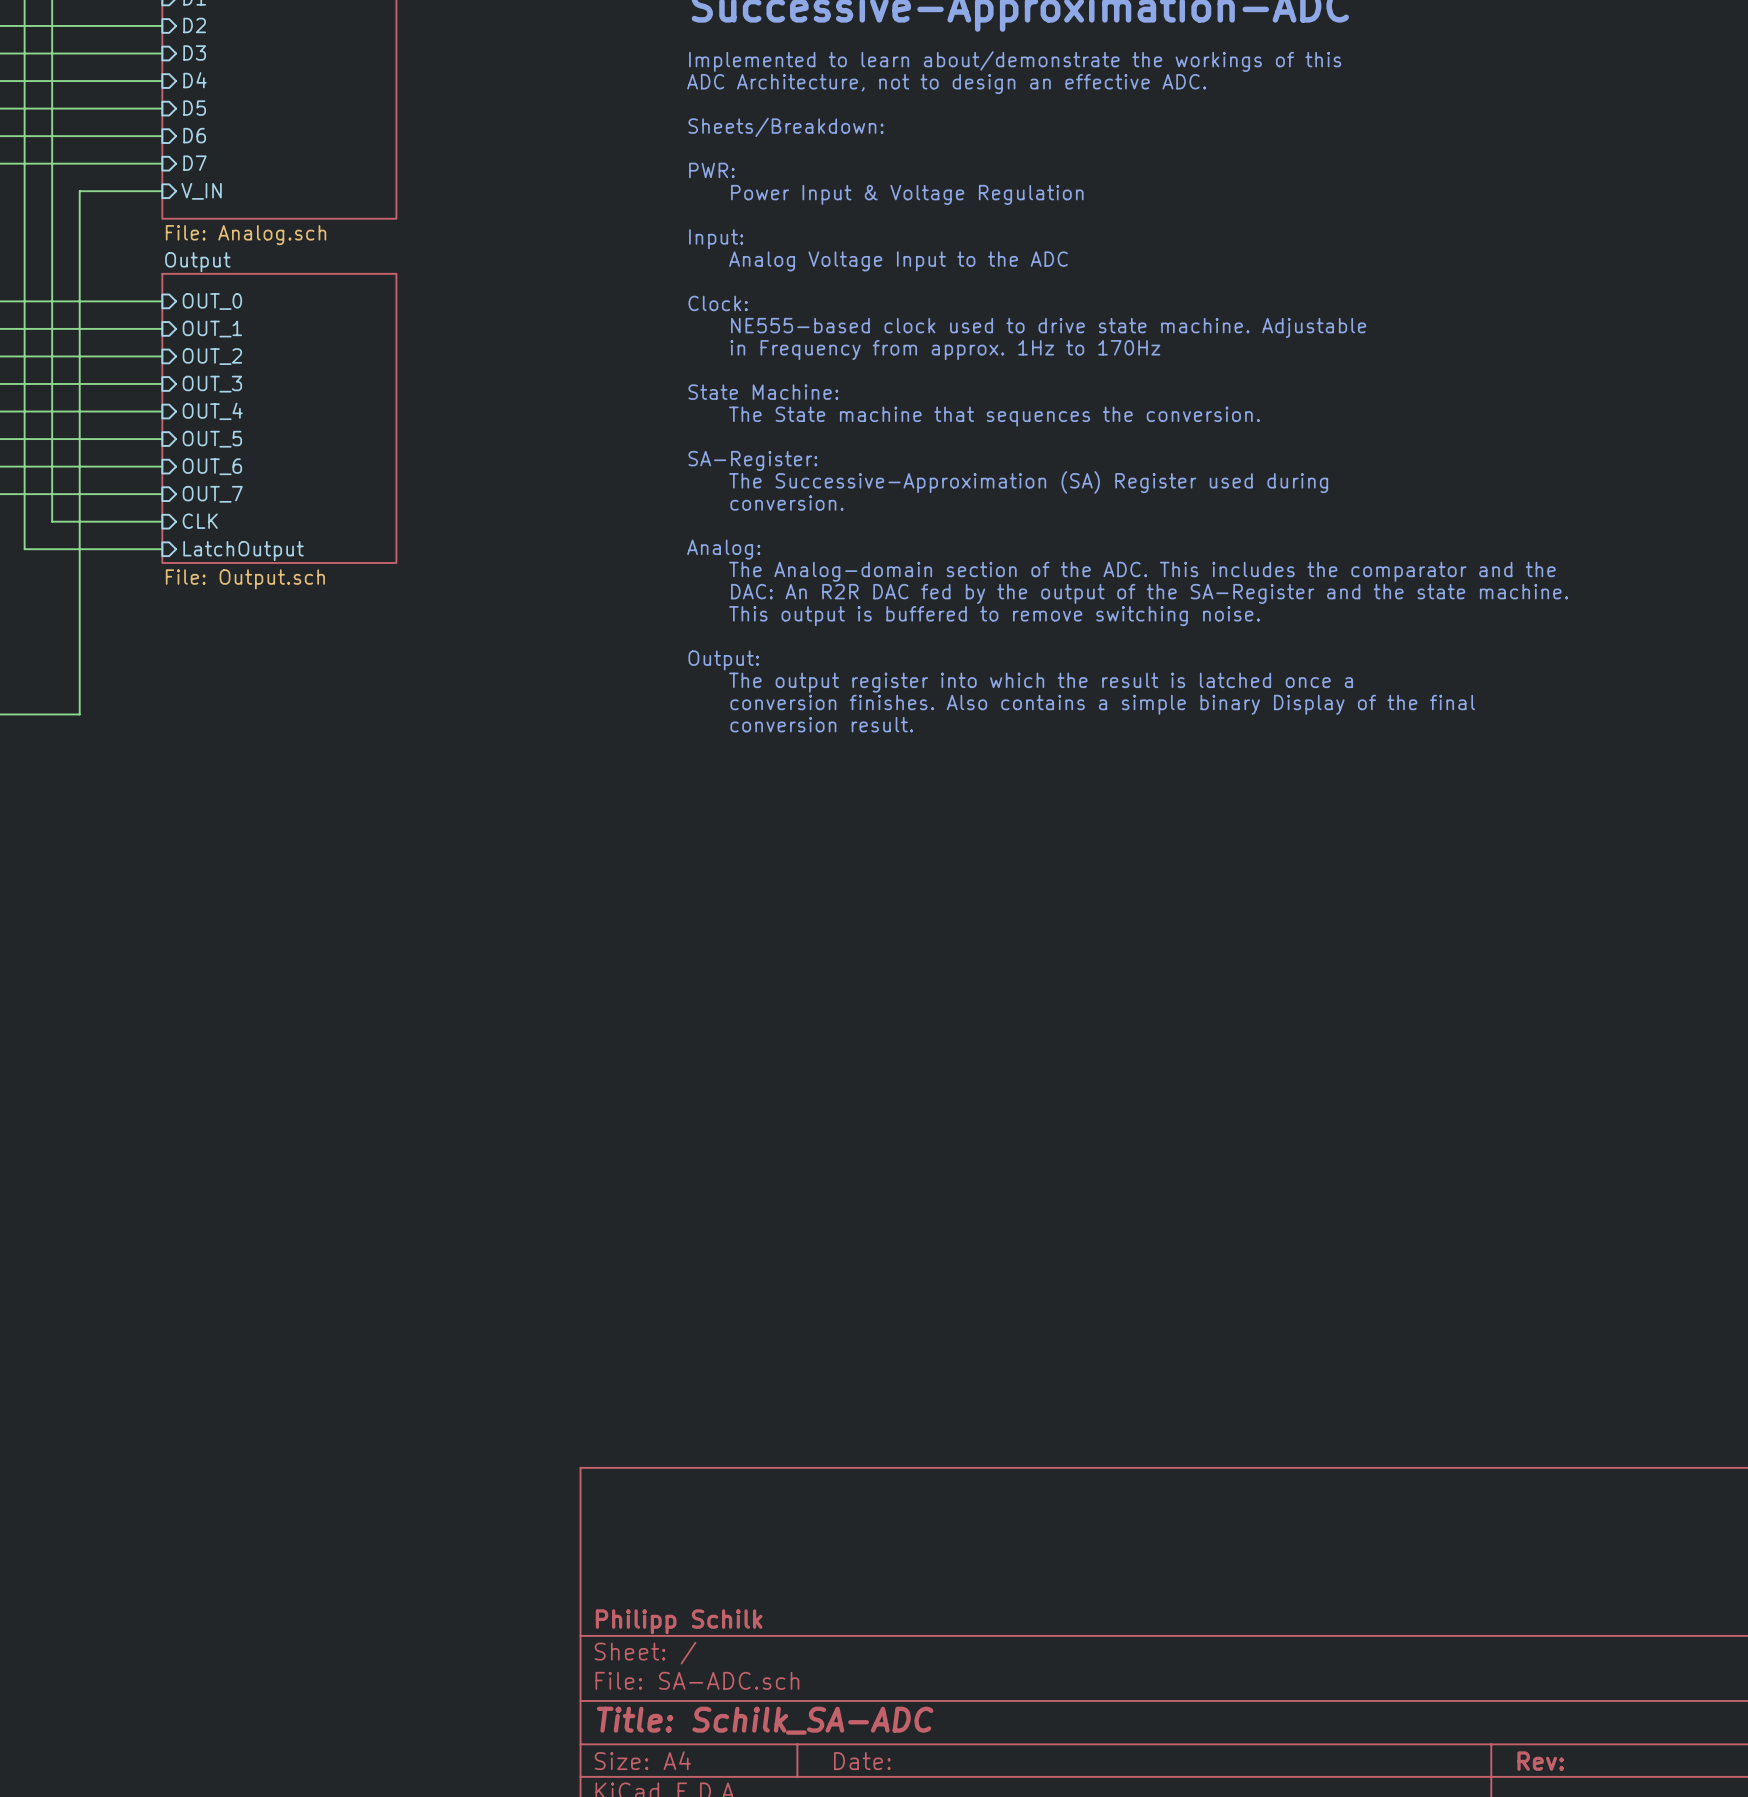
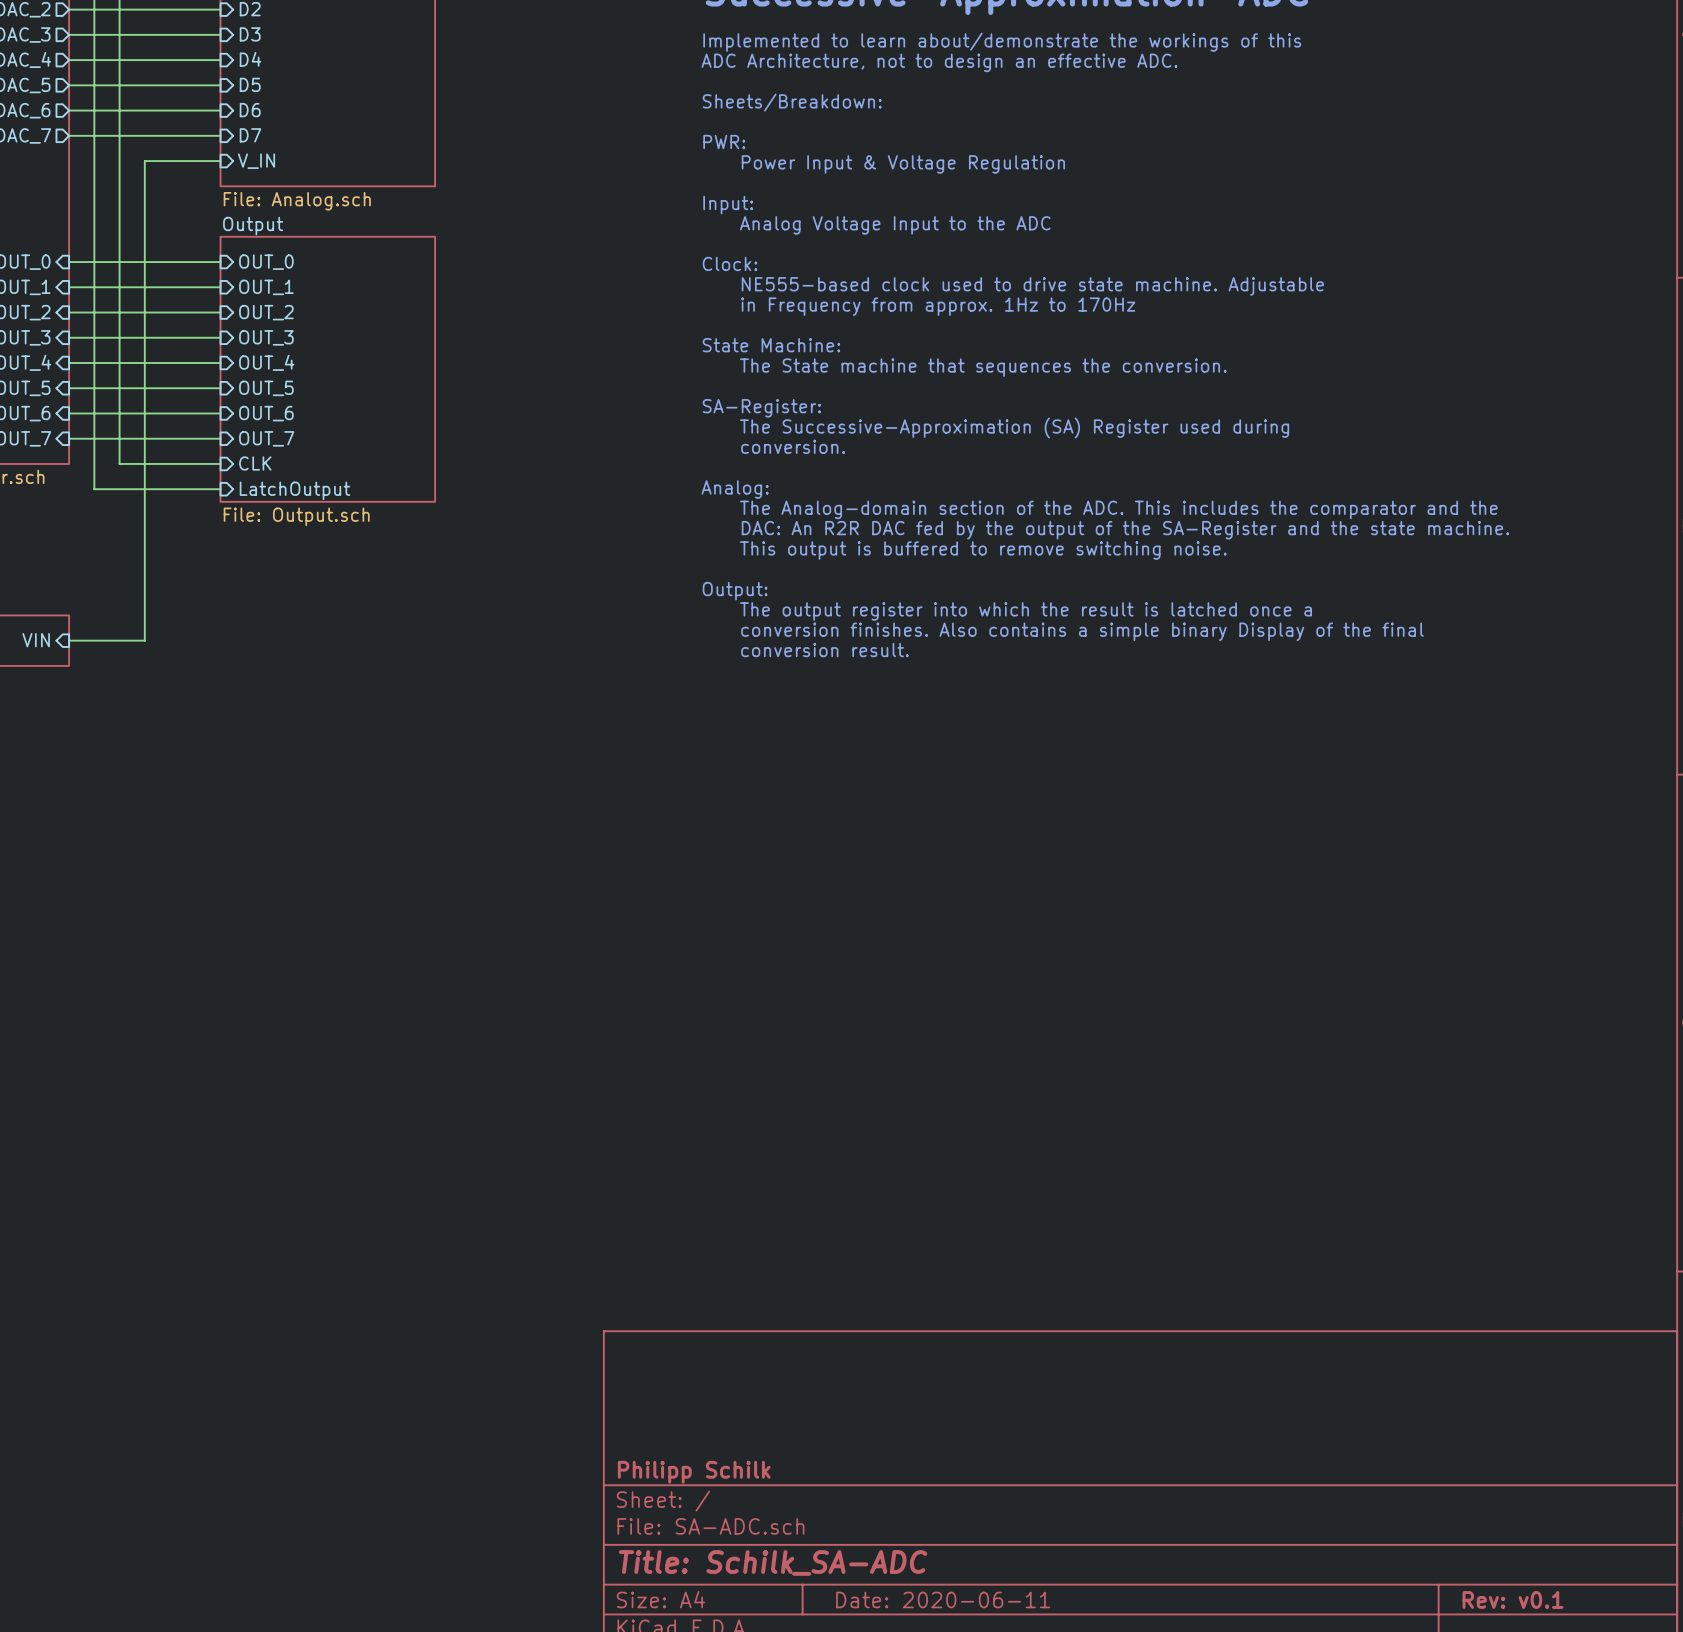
title block: Date: (862, 1761) -> Date: 2020-06-11 (943, 1599)
title block: Rev: (1540, 1761) -> Rev: v0.1 (1513, 1599)

